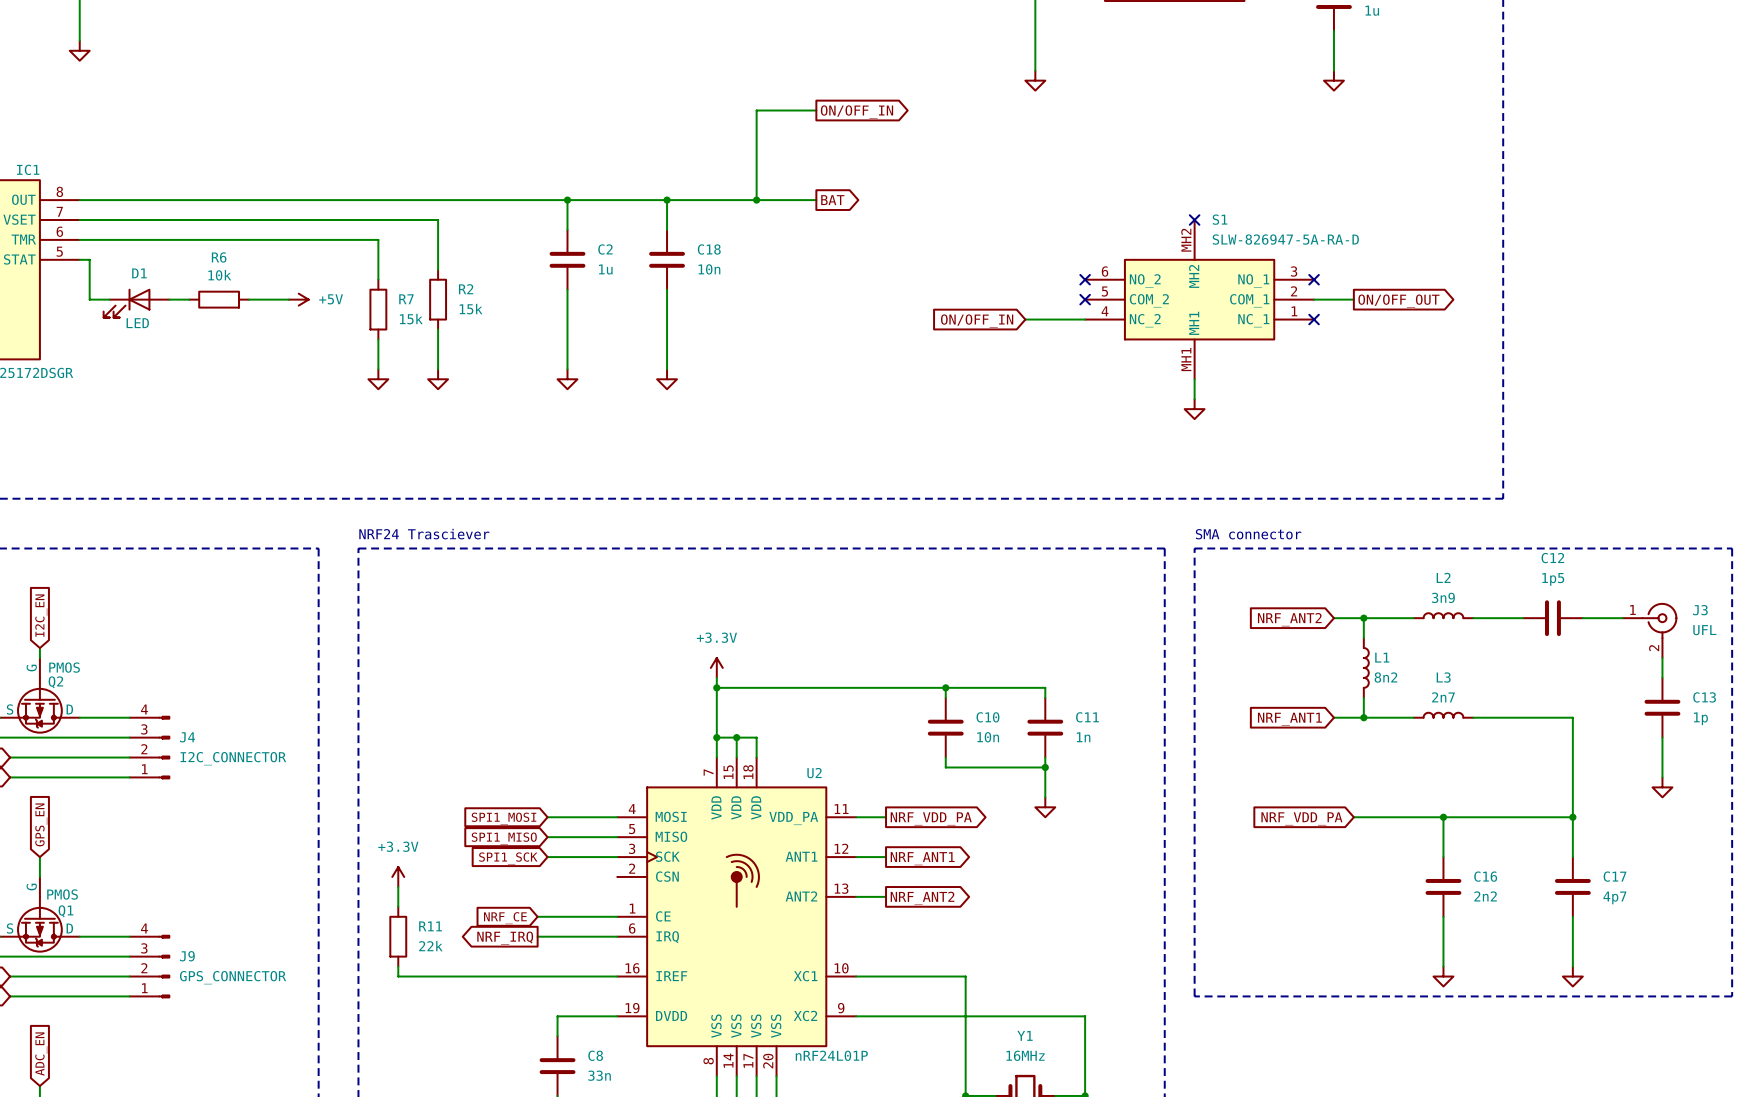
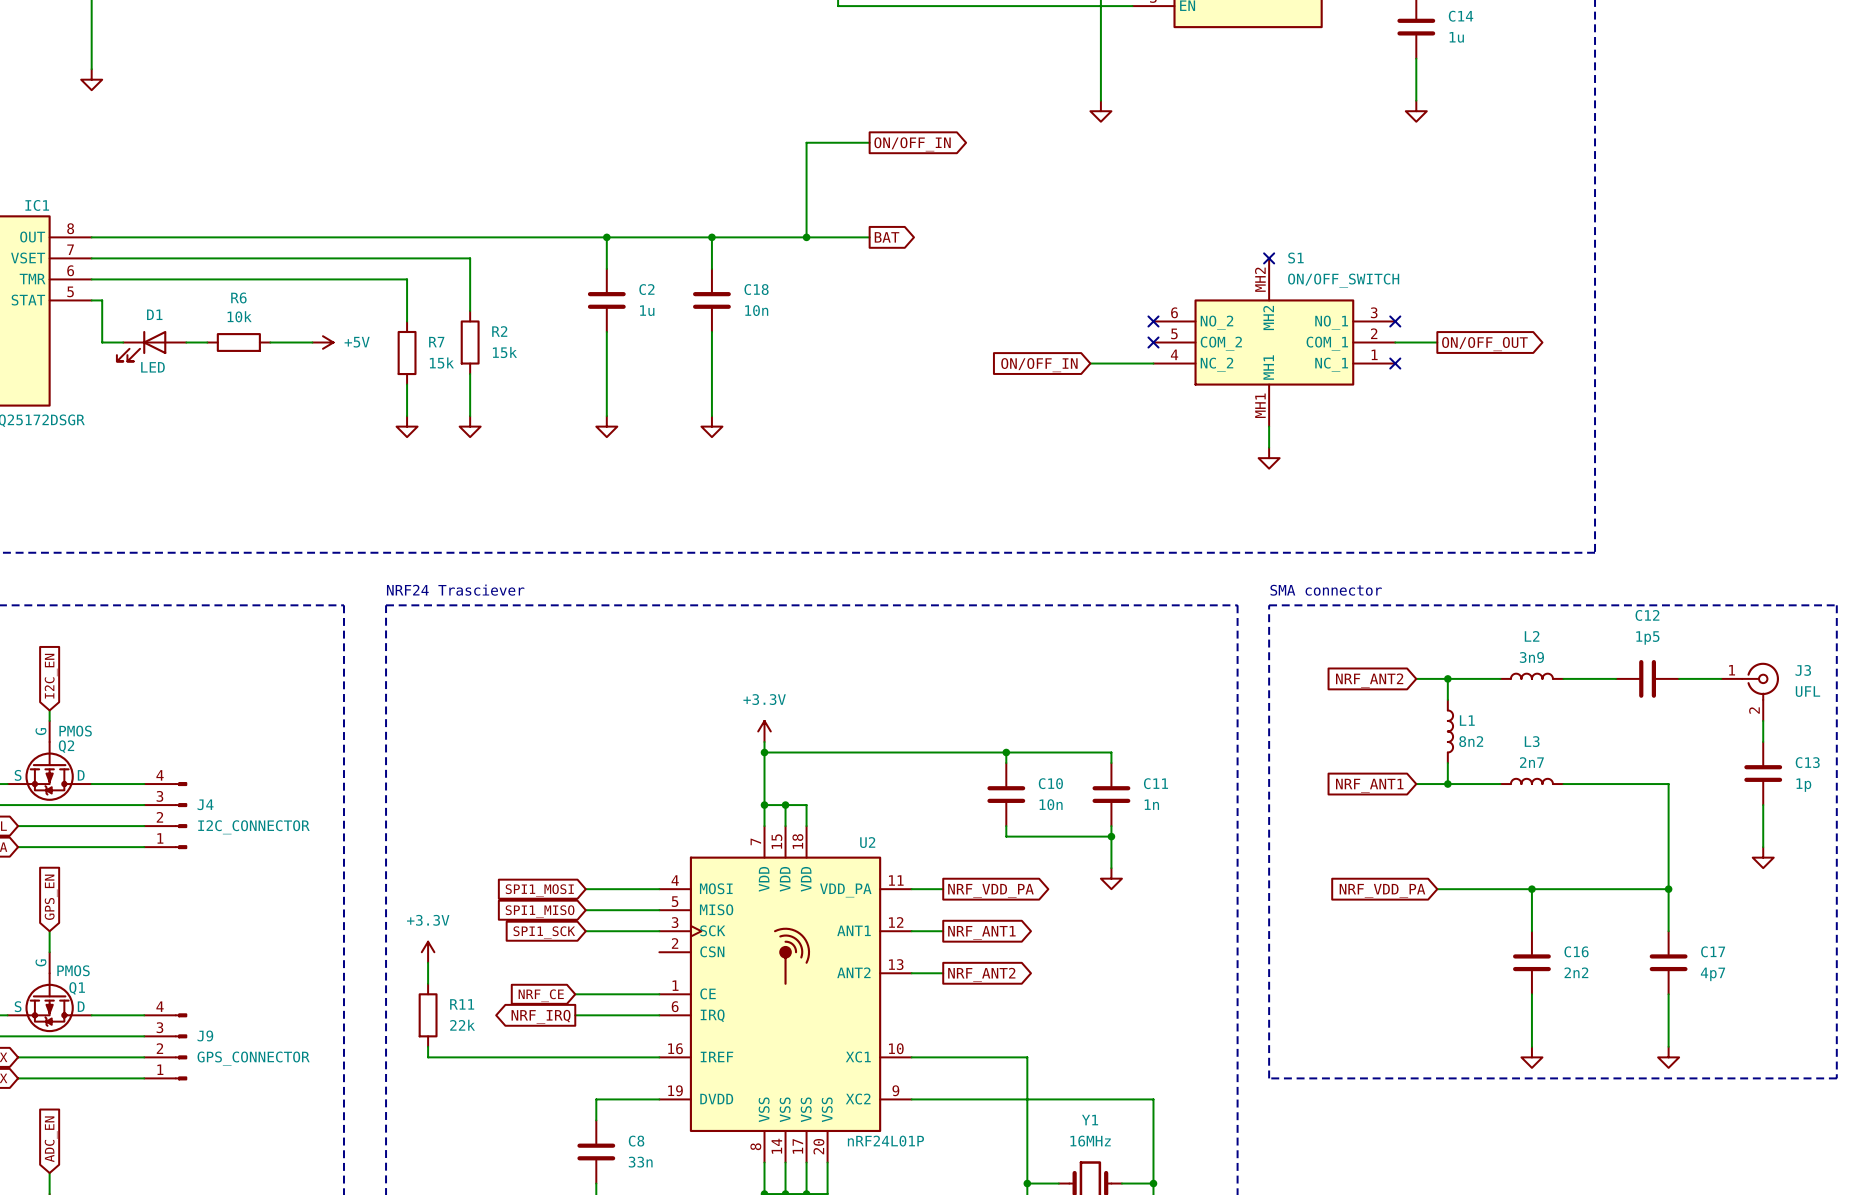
S1 value: SLW-826947-5A-RA-D (1285, 239) -> ON/OFF_SWITCH (1343, 280)

